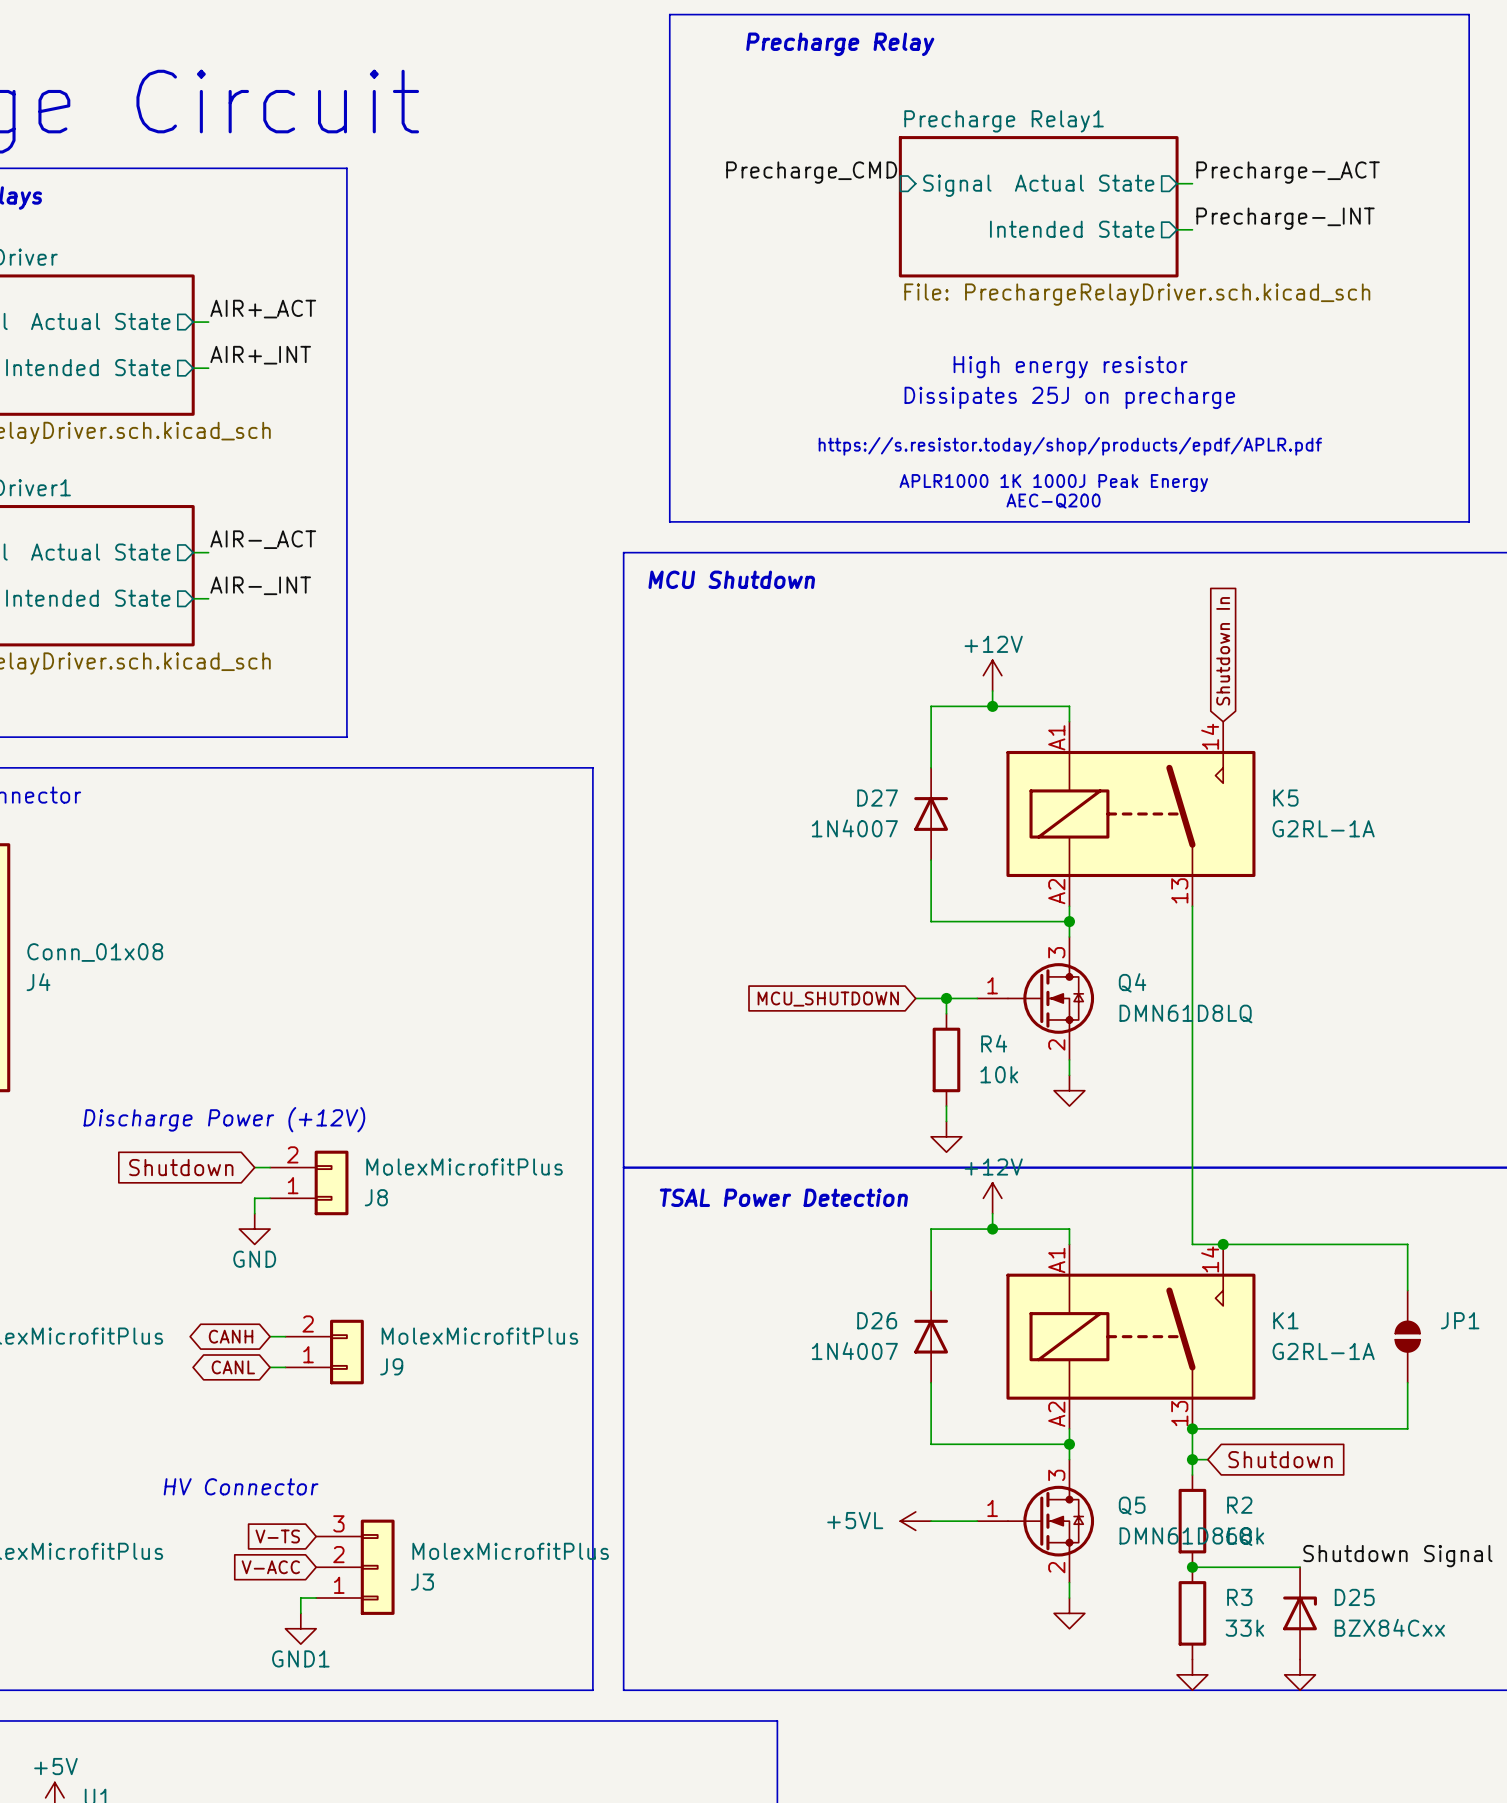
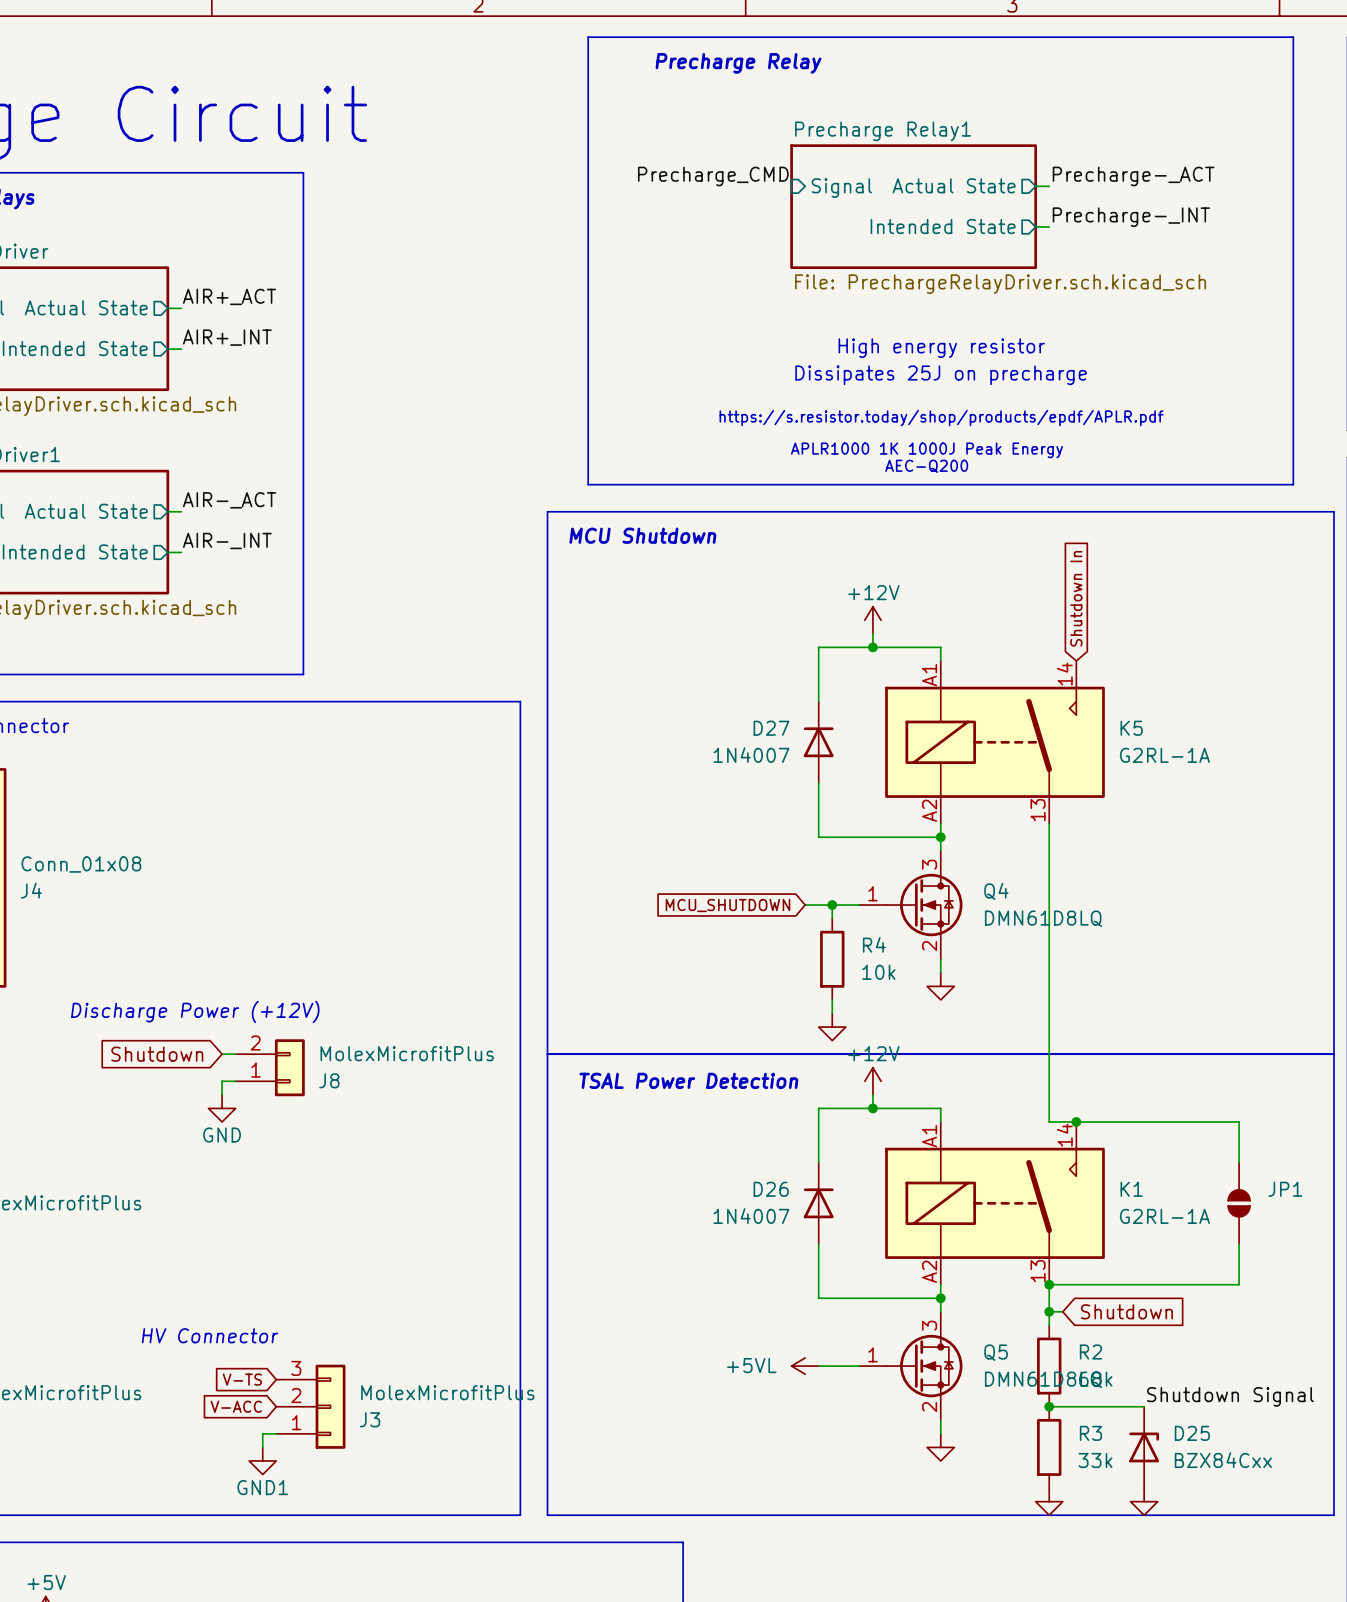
global label: CANH (231, 1336) -> none
wire: (270, 1336) (285, 1336) -> none
J9: MolexMicrofitPlus (324, 1352) -> none
global label: CANL (233, 1367) -> none
wire: (270, 1367) (285, 1367) -> none

